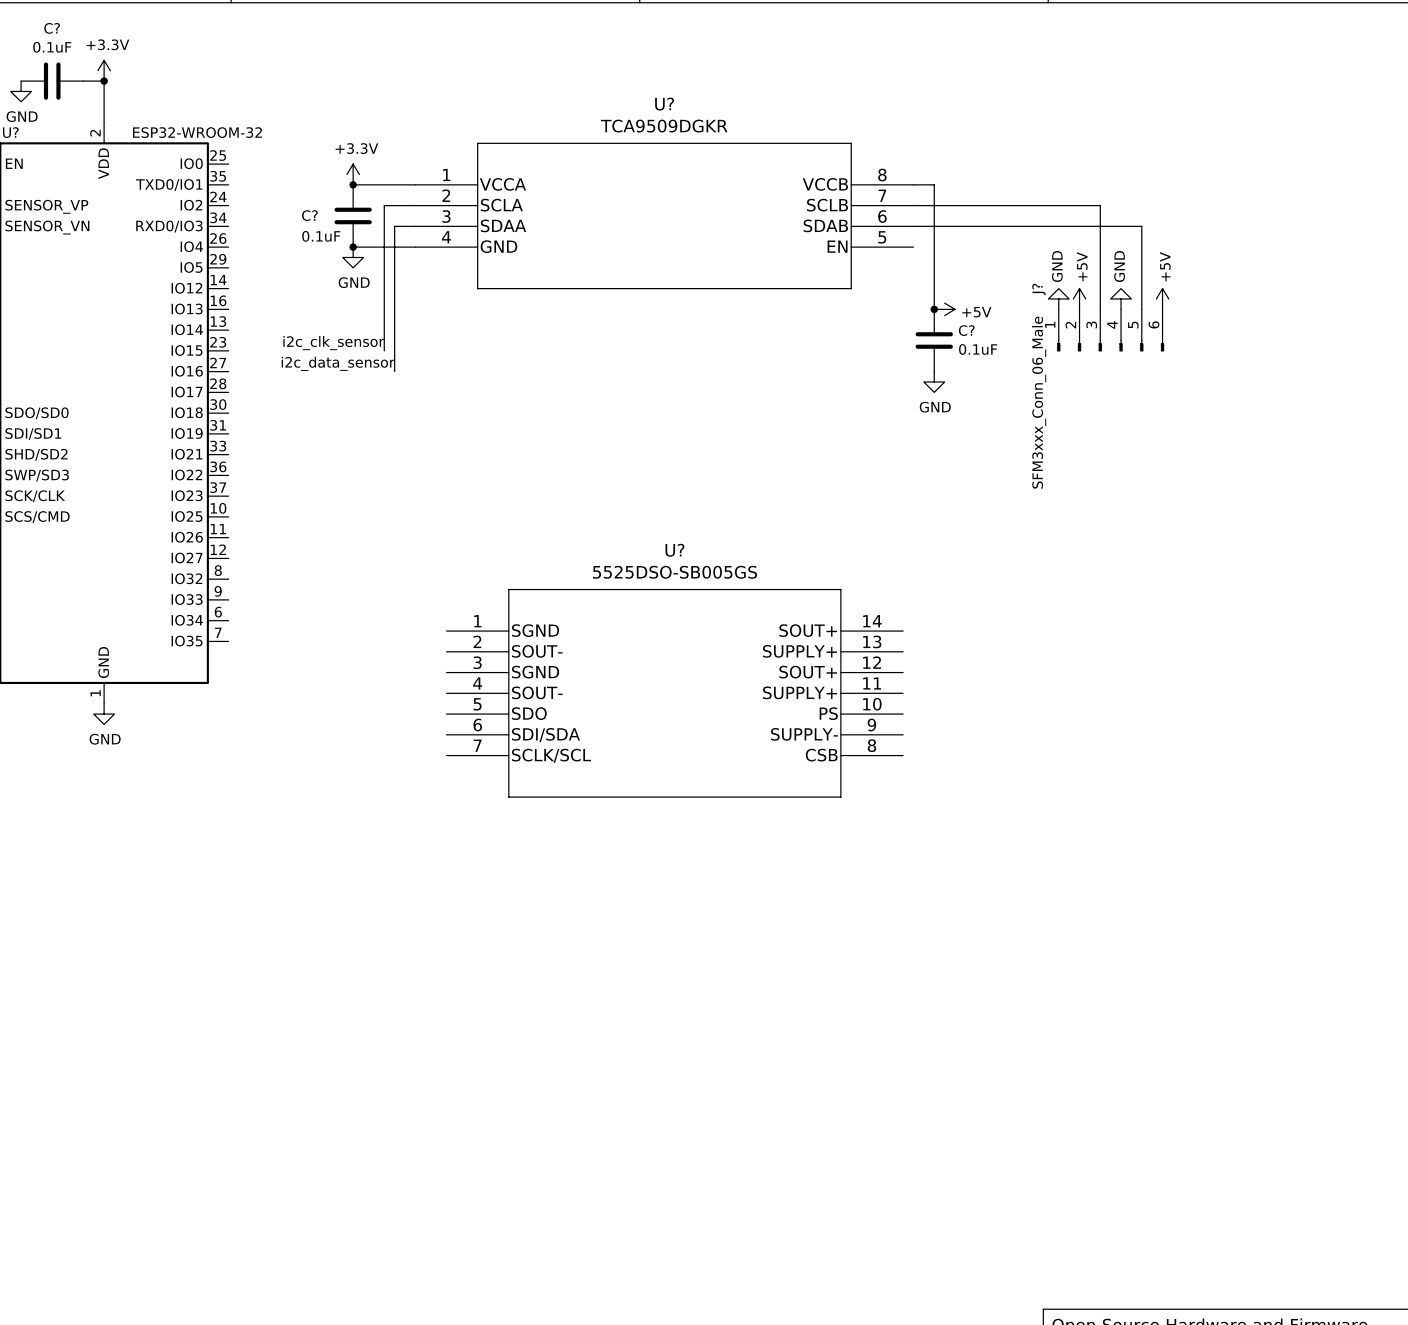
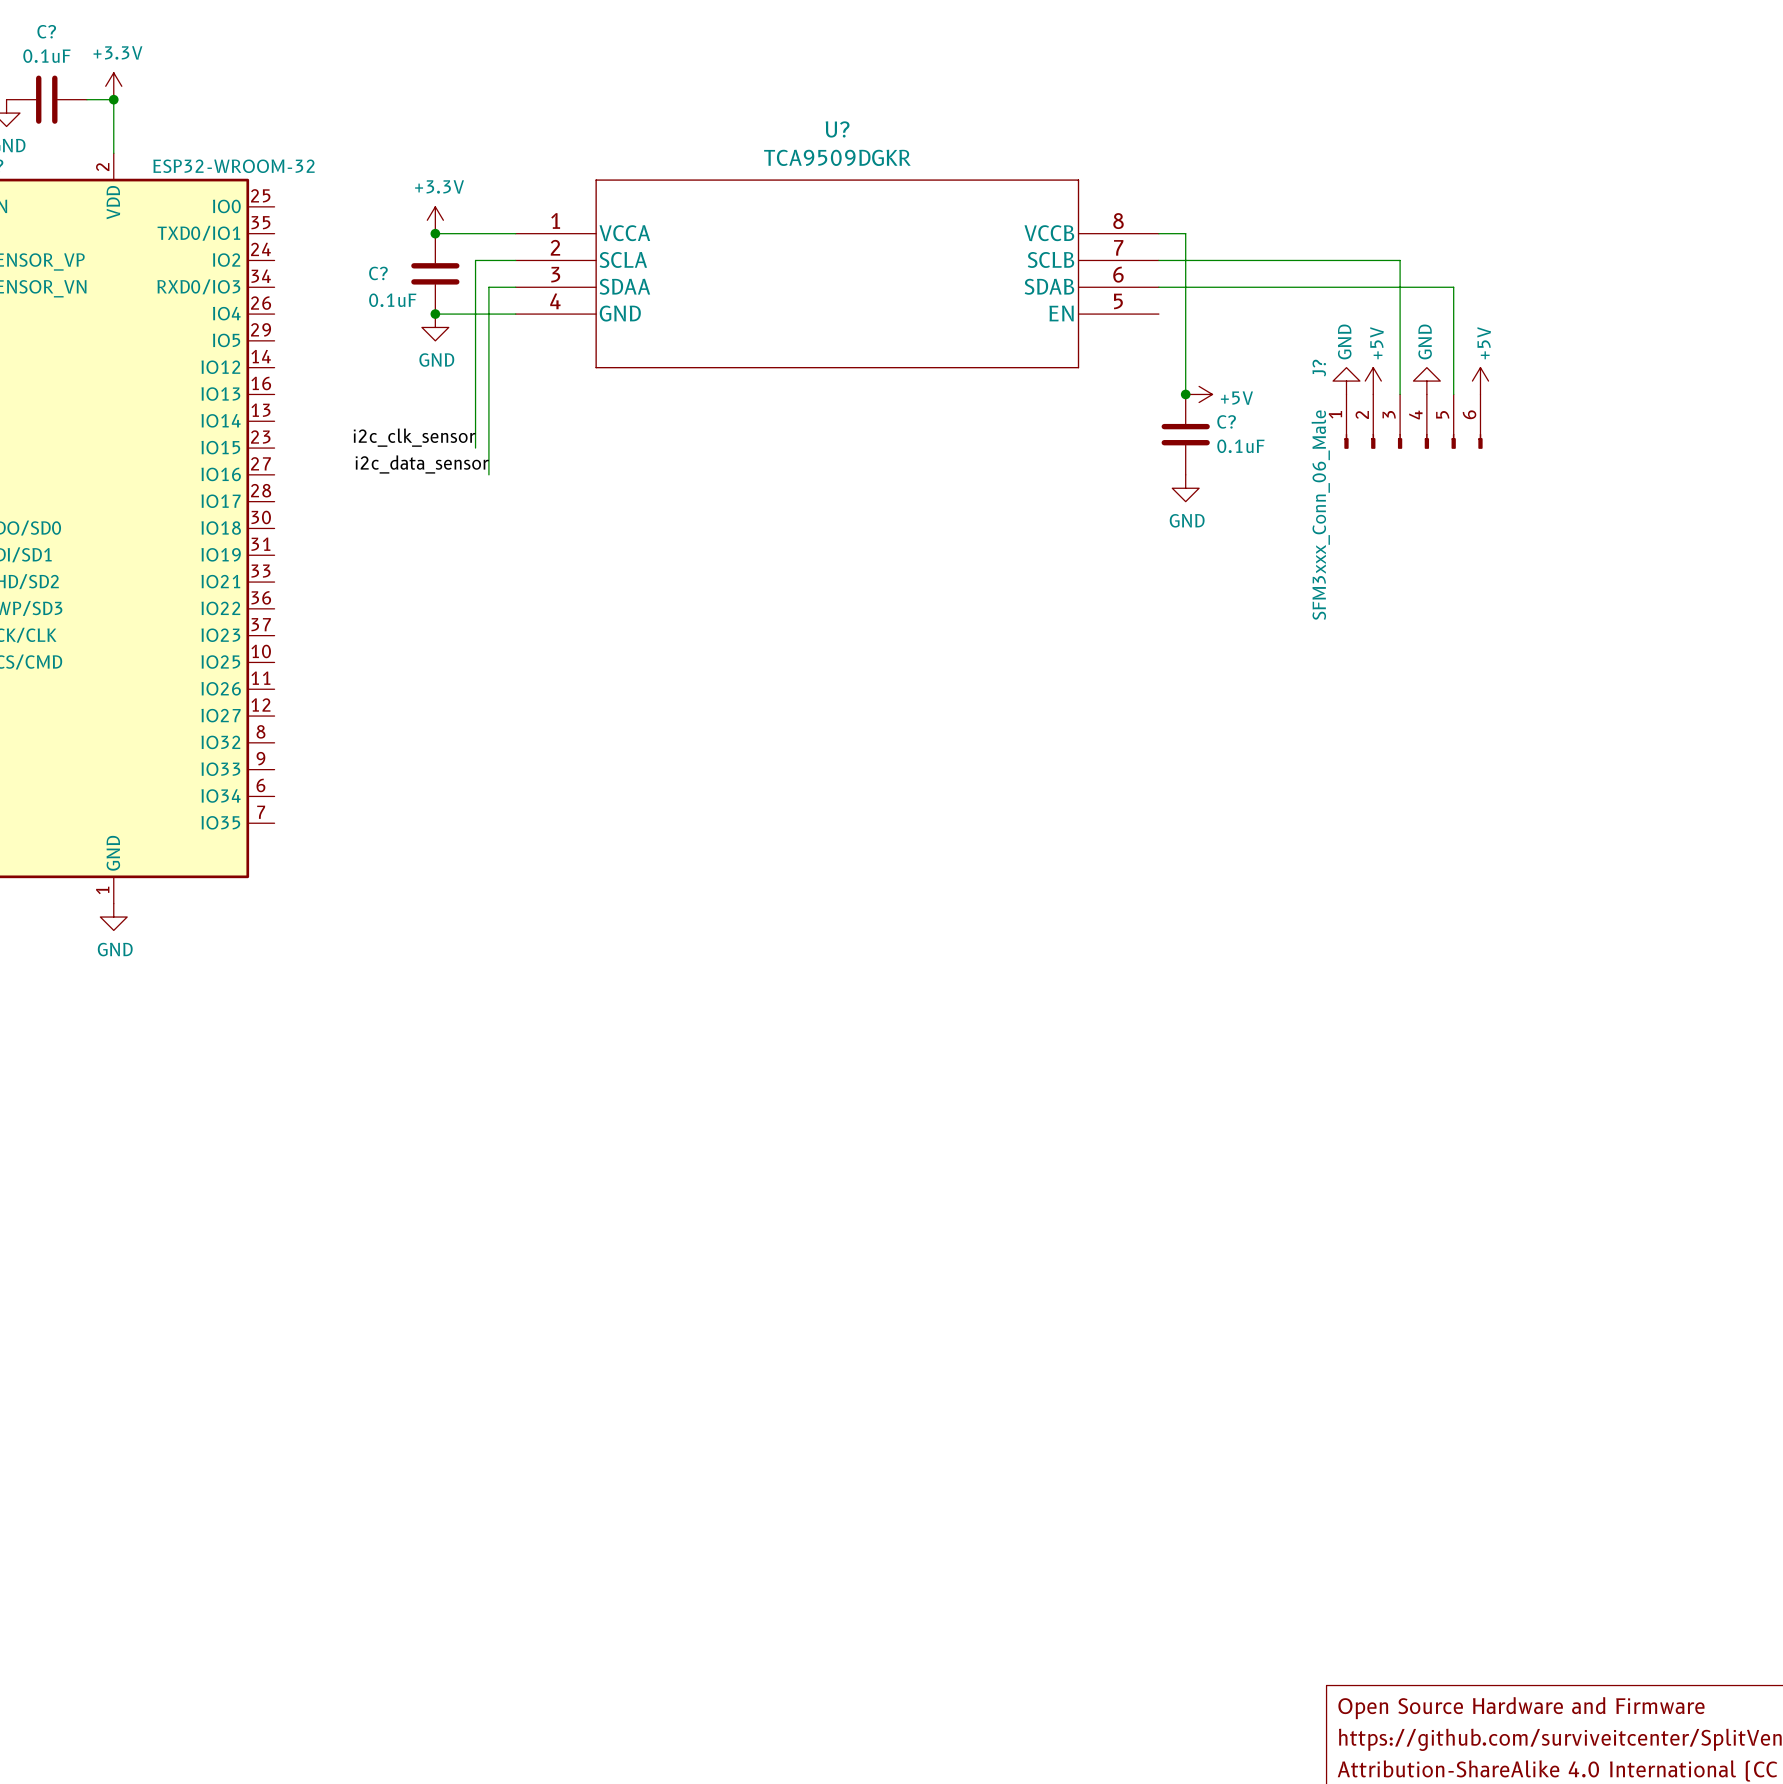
U?: 5525DSO-SB005GS (674, 693) -> none

